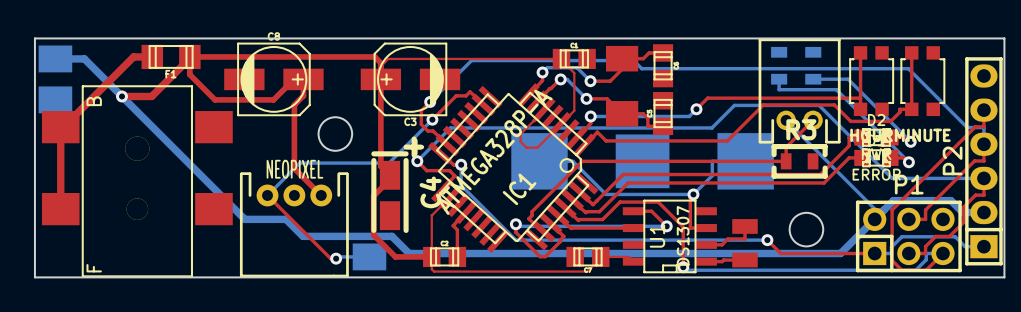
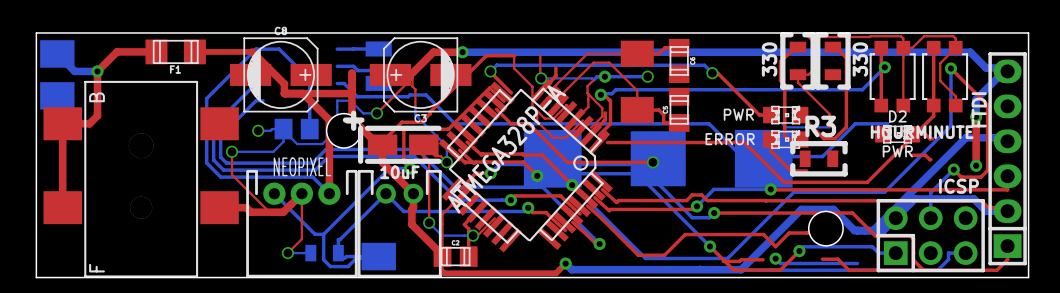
top track: none -> (797, 47) (795, 47) (780, 61) (780, 80) (784, 84) (784, 135) (788, 139) (800, 139)
top track: none -> (832, 47) (835, 47) (846, 57) (846, 127) (834, 138) (823, 138) (800, 115)
top track: none -> (903, 47) (912, 47) (924, 36) (953, 36) (955, 38) (955, 47) (940, 63) (940, 80) (955, 96) (955, 105)
bottom track: none -> (337, 49) (353, 49)
bottom track: none -> (353, 48) (378, 48)
top track: (133, 56) (63, 127) -> (137, 51) (116, 51) (97, 71) (97, 115) (89, 123) (65, 123)
top track: (189, 56) (189, 74) (215, 99) (273, 99) (294, 79) (303, 79) (303, 95) (294, 104) (294, 168) (321, 195) -> (302, 93) (329, 119) (329, 193)
top track: (246, 56) (374, 56) (380, 63) (380, 166) (389, 175) (389, 179) (373, 195) (373, 235) (395, 256) (431, 256) -> (252, 51) (284, 83) (284, 93) (350, 93) (351, 91)
top track: none -> (462, 52) (433, 52) (412, 73) (415, 106)
bottom track: none -> (462, 52) (970, 52) (986, 67) (1007, 67) (976, 99) (976, 116)
via: none -> (462, 52)
bottom track: (55, 58) (84, 58) (244, 219) (285, 219) (302, 236) (391, 236) (409, 253) (840, 253) (862, 231) -> (565, 263) (571, 269) (741, 269) (801, 209) (833, 209) (854, 230) (883, 230)
bottom track: none -> (57, 53) (74, 71) (97, 71)
top track: (189, 58) (151, 96) (122, 96) -> none
part: (574, 58) -> none
top track: none -> (637, 53) (587, 53) (550, 90)
top track: (632, 58) (610, 81) (590, 81) -> none
top track: none -> (540, 55) (541, 78)
part side: bottom (779, 65) -> top (797, 60)
part side: bottom (813, 65) -> top (832, 60)
part: none -> (378, 66)
bottom track: none -> (337, 66) (353, 66) (357, 70) (378, 70) (378, 83)
bottom track: (542, 72) (547, 67) (577, 67) (590, 81) -> none
via: (542, 72) -> none
bottom track: none -> (884, 67) (862, 89) (615, 89) (611, 93) (603, 93)
via: none -> (884, 67)
top track: none -> (951, 68) (987, 105) (987, 170) (981, 177) (961, 177) (953, 169)
bottom track: none -> (951, 68) (951, 125) (884, 192) (793, 192) (727, 258) (645, 258) (572, 185)
via: none -> (951, 68)
top track: none -> (490, 71) (511, 92)
bottom track: none -> (490, 71) (496, 65) (704, 65) (712, 73)
via: none -> (490, 71)
top track: none -> (351, 73) (351, 118) (378, 144) (382, 144) (382, 162) (413, 193) (411, 224) (442, 255)
top track: none -> (712, 73) (717, 73) (759, 115) (771, 115)
via: none -> (712, 73)
top track: (380, 79) (380, 66) (388, 58) (561, 58) (574, 73) (574, 98) -> none
top track: (560, 79) (537, 102) -> none
bottom track: (560, 79) (567, 79) (586, 98) -> none
via: (560, 79) -> none
bottom track: (779, 79) (779, 89) (836, 89) (908, 162) -> none
bottom track: (813, 79) (848, 79) (910, 141) -> none
bottom track: none -> (647, 76) (597, 76) (593, 80) (591, 78) (541, 78)
via: none -> (647, 76)
top track: none -> (412, 77) (376, 113)
via: none -> (541, 78)
top track: none -> (593, 80) (587, 86) (587, 93) (602, 108) (602, 116) (591, 127)
bottom track: none -> (263, 83) (256, 83) (213, 125) (213, 160) (223, 170) (315, 170) (328, 156) (414, 156) (458, 200) (510, 200)
bottom track: none -> (337, 83) (344, 83) (357, 96) (426, 95) (454, 123) (709, 123) (741, 156) (822, 156) (855, 123) (887, 123)
part: (799, 90) -> none
via position: (122, 96) -> (97, 71)
top track: none -> (603, 93) (610, 101) (610, 123) (599, 135)
top track: (586, 98) (607, 98) (622, 113) -> (559, 96) (558, 98) (593, 62) (609, 62) (637, 90) (637, 110)
top track: (860, 98) (707, 98) (696, 109) -> none
top track: (430, 101) (421, 110) (421, 124) (427, 131) (432, 131) (447, 144) -> none
bottom track: (430, 101) (471, 60) (633, 60) (641, 68) (908, 68) (967, 127) (983, 127) (983, 144) -> none
via: (430, 101) -> none
bottom track: none -> (263, 100) (256, 100) (220, 136) (220, 157) (226, 163) (312, 163) (326, 149) (417, 149) (455, 187) (542, 187) (599, 244)
top track: (484, 104) (470, 91) (466, 95) (456, 95) (432, 119) -> none
top track: none -> (504, 101) (489, 88) (448, 129) (404, 129) (403, 162) (410, 168)
bottom track: (696, 109) (689, 116) (590, 116) -> none
via: (696, 109) -> none
top track: none -> (903, 105) (903, 38) (900, 36) (808, 37) (812, 41) (812, 70) (808, 74) (797, 74) (797, 82) (829, 113) (829, 127)
top track: (911, 109) (899, 109) (899, 112) (890, 121) (850, 121) (834, 105) (763, 105) (727, 140) (606, 140) (597, 132) (584, 146) -> (933, 105) (933, 115) (867, 182) (784, 182) (744, 142) (607, 142)
bottom track: none -> (415, 106) (415, 115) (446, 146) (446, 162)
top track: (983, 110) (983, 126) (975, 126) (892, 210) (892, 239) -> (714, 213) (852, 213) (875, 235) (910, 235) (913, 239)
top track: none -> (563, 108) (566, 105) (553, 118) (544, 118) (537, 111)
top track: none -> (496, 109) (511, 123) (528, 123) (567, 162) (652, 162)
P2 value: none -> FTDI (979, 109)
top track: none -> (537, 111) (537, 121) (553, 137) (565, 137) (582, 120)
top track: none -> (537, 111) (532, 106) (532, 86) (514, 68) (514, 55) (486, 55) (421, 122) (401, 122) (381, 144)
bottom track: none -> (376, 113) (363, 113) (350, 100) (337, 100) (337, 129) (322, 144) (297, 144) (283, 130)
via: none -> (376, 113)
via: (590, 116) -> none
top track: (567, 117) (537, 147) (526, 147) (520, 141) (520, 134) (544, 109) (534, 120) -> none
part: none -> PWR (785, 115)
bottom track: (432, 119) (389, 163) (299, 163) (267, 195) -> (323, 234) (315, 234) (274, 193)
via: (432, 119) -> none
bottom track: (786, 120) (875, 209) (884, 209) -> none
top track: (813, 120) (786, 147) (786, 161) (582, 161) (532, 211) (532, 215) (528, 218) (542, 231) -> none
top track: none -> (976, 116) (976, 165)
via: none -> (976, 116)
bottom track: none -> (782, 123) (785, 127) (829, 127)
bottom track: none -> (309, 129) (309, 79) (279, 49) (256, 49) (206, 98) (206, 163) (220, 177) (312, 177) (329, 193)
bottom track: none -> (258, 130) (283, 129) (283, 141) (273, 151) (232, 151)
via: none -> (258, 130)
top track: (862, 137) (849, 137) (849, 145) (820, 174) (623, 174) (593, 204) (579, 191) -> none
part: none -> 10uF (392, 137)
bottom track: none -> (1007, 137) (965, 137) (873, 230)
via: (910, 141) -> none
top track: none -> (771, 139) (771, 151) (791, 170) (806, 170)
part: none -> ERROR (785, 139)
top track: (983, 144) (983, 161) (974, 161) (925, 209) (925, 219) (908, 219) -> none
top track: none -> (467, 142) (481, 155) (542, 155) (572, 185)
top track: none -> (459, 150) (474, 163) (523, 162) (537, 175)
top track: none -> (232, 151) (232, 174) (272, 214) (280, 214) (301, 193)
via: none -> (232, 151)
top track: (862, 157) (849, 157) (824, 182) (628, 182) (599, 211) (585, 212) (571, 199) -> none
part: ERROR (876, 157) -> none
P2 name: P2 (952, 160) -> none
top track: (417, 161) (426, 170) (449, 170) (454, 175) (442, 189) -> none
bottom track: (417, 161) (450, 127) (711, 127) (734, 105) (819, 105) (892, 178) (983, 178) -> none
via position: (417, 161) -> (410, 168)
bottom track: (539, 161) (572, 161) (605, 194) (693, 194) (712, 175) (712, 161) (745, 161) -> none
via: (908, 162) -> none
top track: none -> (446, 162) (440, 156) (435, 156) (423, 144) (423, 157) (429, 162) (429, 222)
via: none -> (446, 162)
bottom track: (461, 164) (461, 185) (515, 240) (767, 240) -> none
via position: (461, 164) -> (490, 173)
via: none -> (652, 162)
via: none -> (976, 165)
bottom track: none -> (410, 168) (389, 168) (323, 234)
bottom track: none -> (953, 169) (930, 192) (930, 218)
via: none -> (953, 169)
top track: none -> (490, 173) (474, 174) (461, 188)
bottom track: none -> (490, 173) (499, 164) (639, 164) (692, 217) (709, 217) (714, 213)
bottom track: none -> (537, 175) (539, 173) (637, 173) (710, 246)
via: none -> (537, 175)
C4: (397, 184) -> none
P1 name: P1 (909, 184) -> none
via: none -> (572, 185)
P1 value: none -> ICSP (958, 186)
IC1 name: IC1 (519, 189) -> none
top track: none -> (602, 189) (616, 202) (618, 200) (686, 200) (692, 195) (701, 195) (707, 200) (981, 200) (988, 207) (1007, 207)
bottom track: none -> (770, 189) (713, 189) (696, 206)
via: none -> (770, 189)
top track: (983, 191) (983, 195) (975, 195) (963, 206) (963, 222) (949, 236) (935, 236) (925, 246) (925, 253) (908, 253) -> (1007, 189) (770, 189)
top track: (693, 194) (690, 197) (690, 228) (706, 228) -> none
via: (693, 194) -> none
top track: (267, 195) (330, 258) (336, 258) -> none
top track: none -> (301, 193) (283, 212) (250, 212) (246, 207) (219, 207)
top track: none -> (301, 193) (301, 239) (287, 253)
top track: none -> (594, 197) (609, 210) (693, 209) (696, 206)
top track: none -> (510, 200) (515, 195) (560, 195) (580, 214)
via: none -> (510, 200)
top track: (564, 207) (578, 220) (602, 219) (620, 202) (658, 202) (683, 227) (683, 267) -> none
top track: none -> (587, 205) (638, 255) (664, 255) (685, 234) (763, 234) (775, 246) (789, 233) (822, 233)
via: none -> (696, 206)
top track: none -> (528, 207) (533, 212) (546, 212) (565, 230)
bottom track: none -> (528, 207) (524, 211) (403, 211) (385, 193) (338, 239) (338, 253)
via: none -> (528, 207)
top track: (633, 211) (651, 211) (666, 226) -> none
via: none -> (714, 213)
top track: (557, 215) (571, 228) (633, 228) -> none
top track: none -> (494, 218) (477, 235) (473, 235)
bottom track: none -> (429, 222) (441, 235) (473, 235)
via: none -> (429, 222)
top track: (550, 223) (563, 236) (545, 256) (540, 256) (515, 232) (515, 224) -> none
top track: none -> (572, 222) (596, 244) (599, 244)
part: none -> (399, 223)
bottom track: (515, 224) (518, 226) (666, 226) -> none
via: (515, 224) -> none
via: (666, 226) -> none
top track: (744, 226) (744, 238) (727, 238) (722, 244) (706, 244) -> none
bottom track: none -> (323, 234) (323, 259) (330, 266) (348, 266) (356, 258) (378, 258)
via: none -> (473, 235)
U1: DS1307 (669, 236) -> none
top track: (767, 240) (780, 253) (874, 253) -> none
via: (767, 240) -> none
part: (744, 243) -> none
via: none -> (599, 244)
bottom track: (983, 246) (965, 246) (955, 236) (901, 236) (891, 247) (891, 253) (874, 253) -> (799, 251) (803, 246) (872, 246) (878, 253) (895, 253)
top track: none -> (710, 246) (733, 270) (780, 270) (799, 251)
via: none -> (710, 246)
via: none -> (799, 251)
bottom track: none -> (287, 253) (310, 253)
via: none -> (287, 253)
part: none -> (324, 253)
top track: (942, 253) (926, 270) -> (1007, 242) (1007, 259) (997, 270) (948, 270)
part side: top (587, 256) -> bottom (296, 129)
via: (336, 258) -> none
bottom track: none -> (775, 258) (780, 263) (857, 263)
via: none -> (775, 258)
top track: none -> (822, 259) (837, 259) (849, 270) (923, 270)
top track: (633, 261) (628, 256) (600, 256) (587, 271) (434, 271) (431, 269) -> none
top track: none -> (565, 263) (555, 273) (444, 273) (442, 271)
via: none -> (565, 263)
via: (683, 267) -> none

